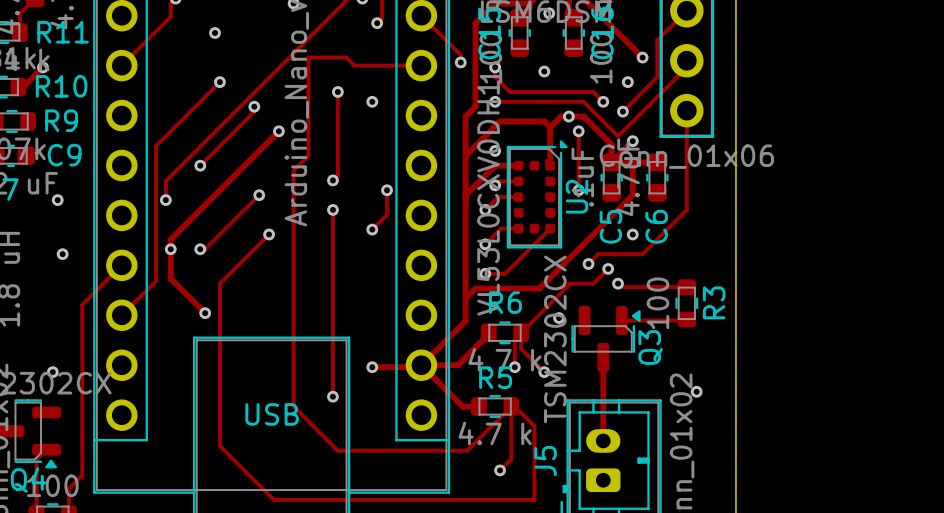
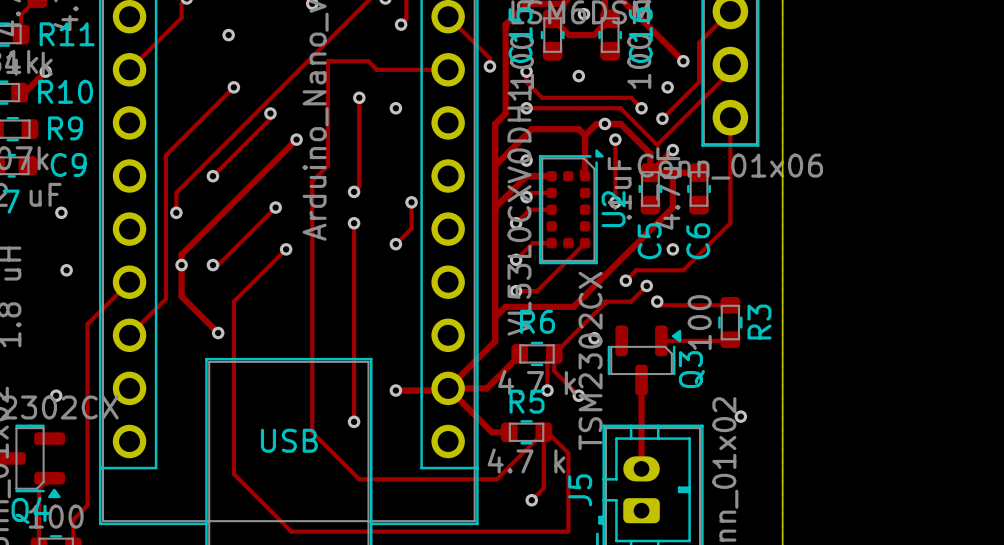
track: none -> (552, 18) (568, 35) (593, 35) (610, 18)

